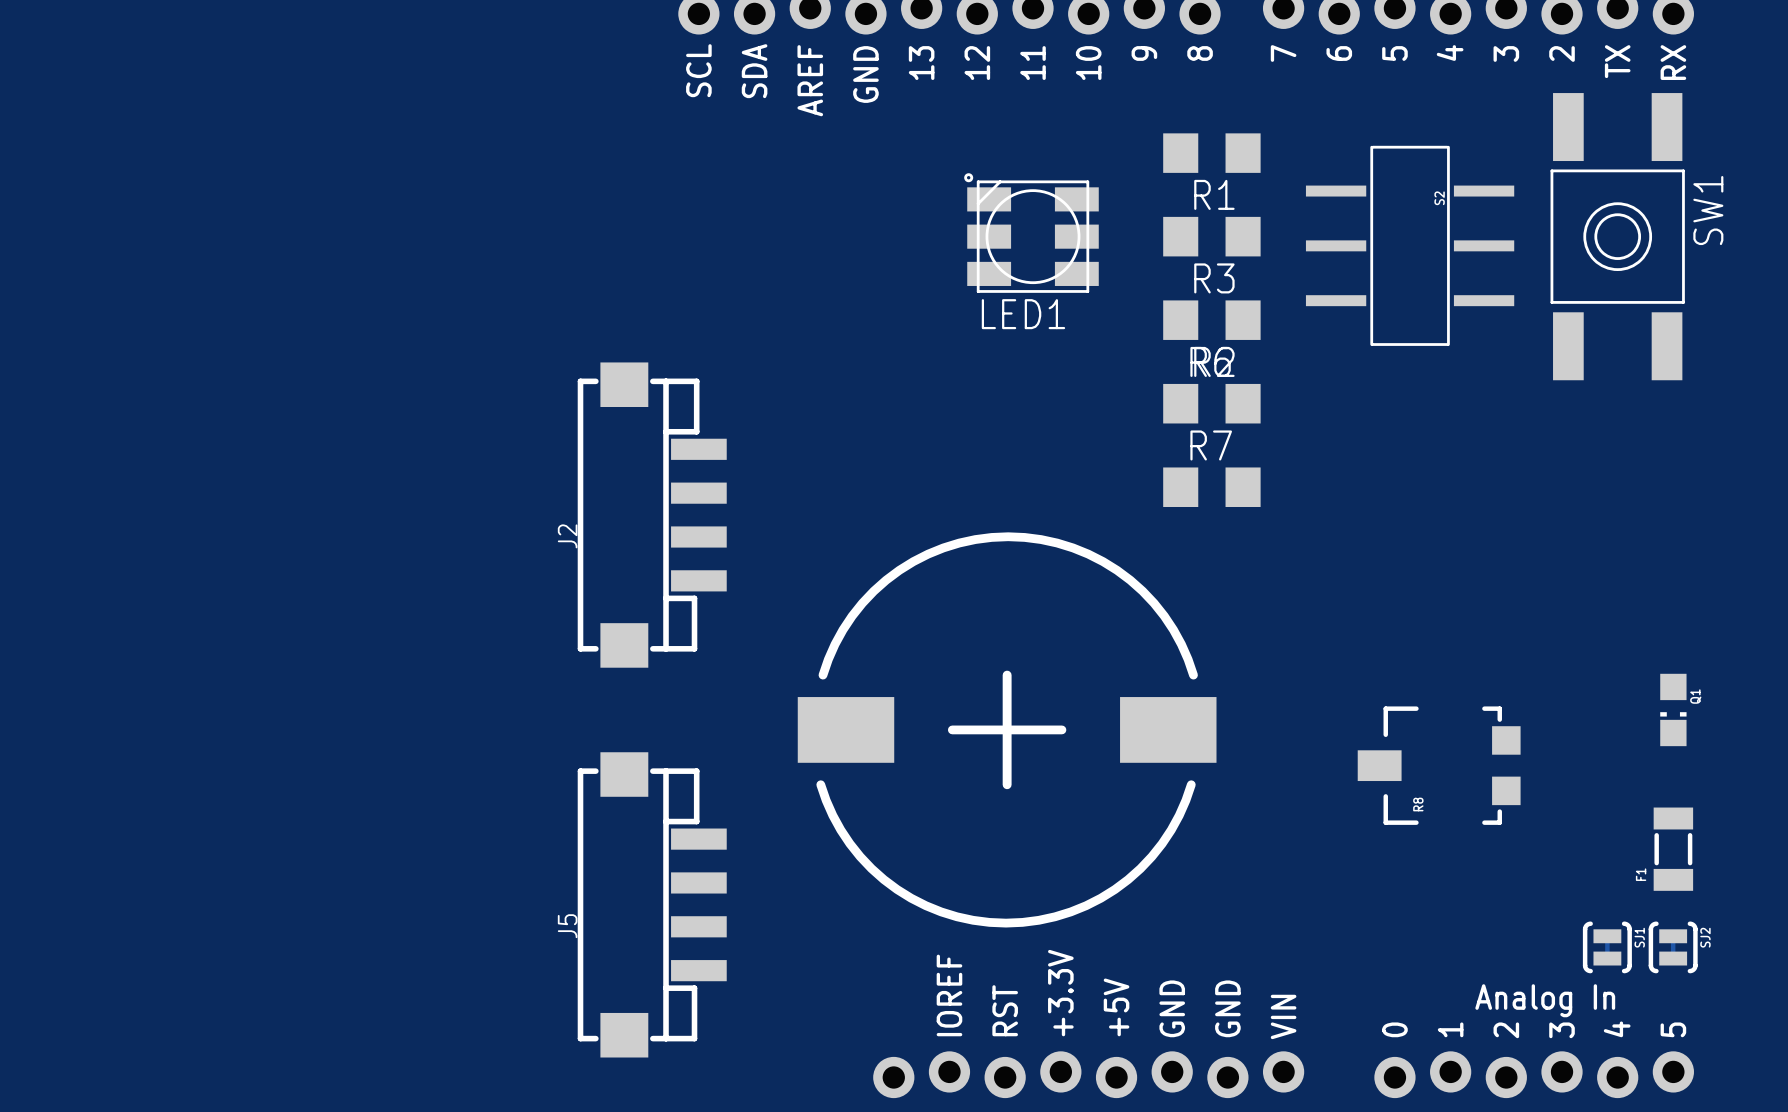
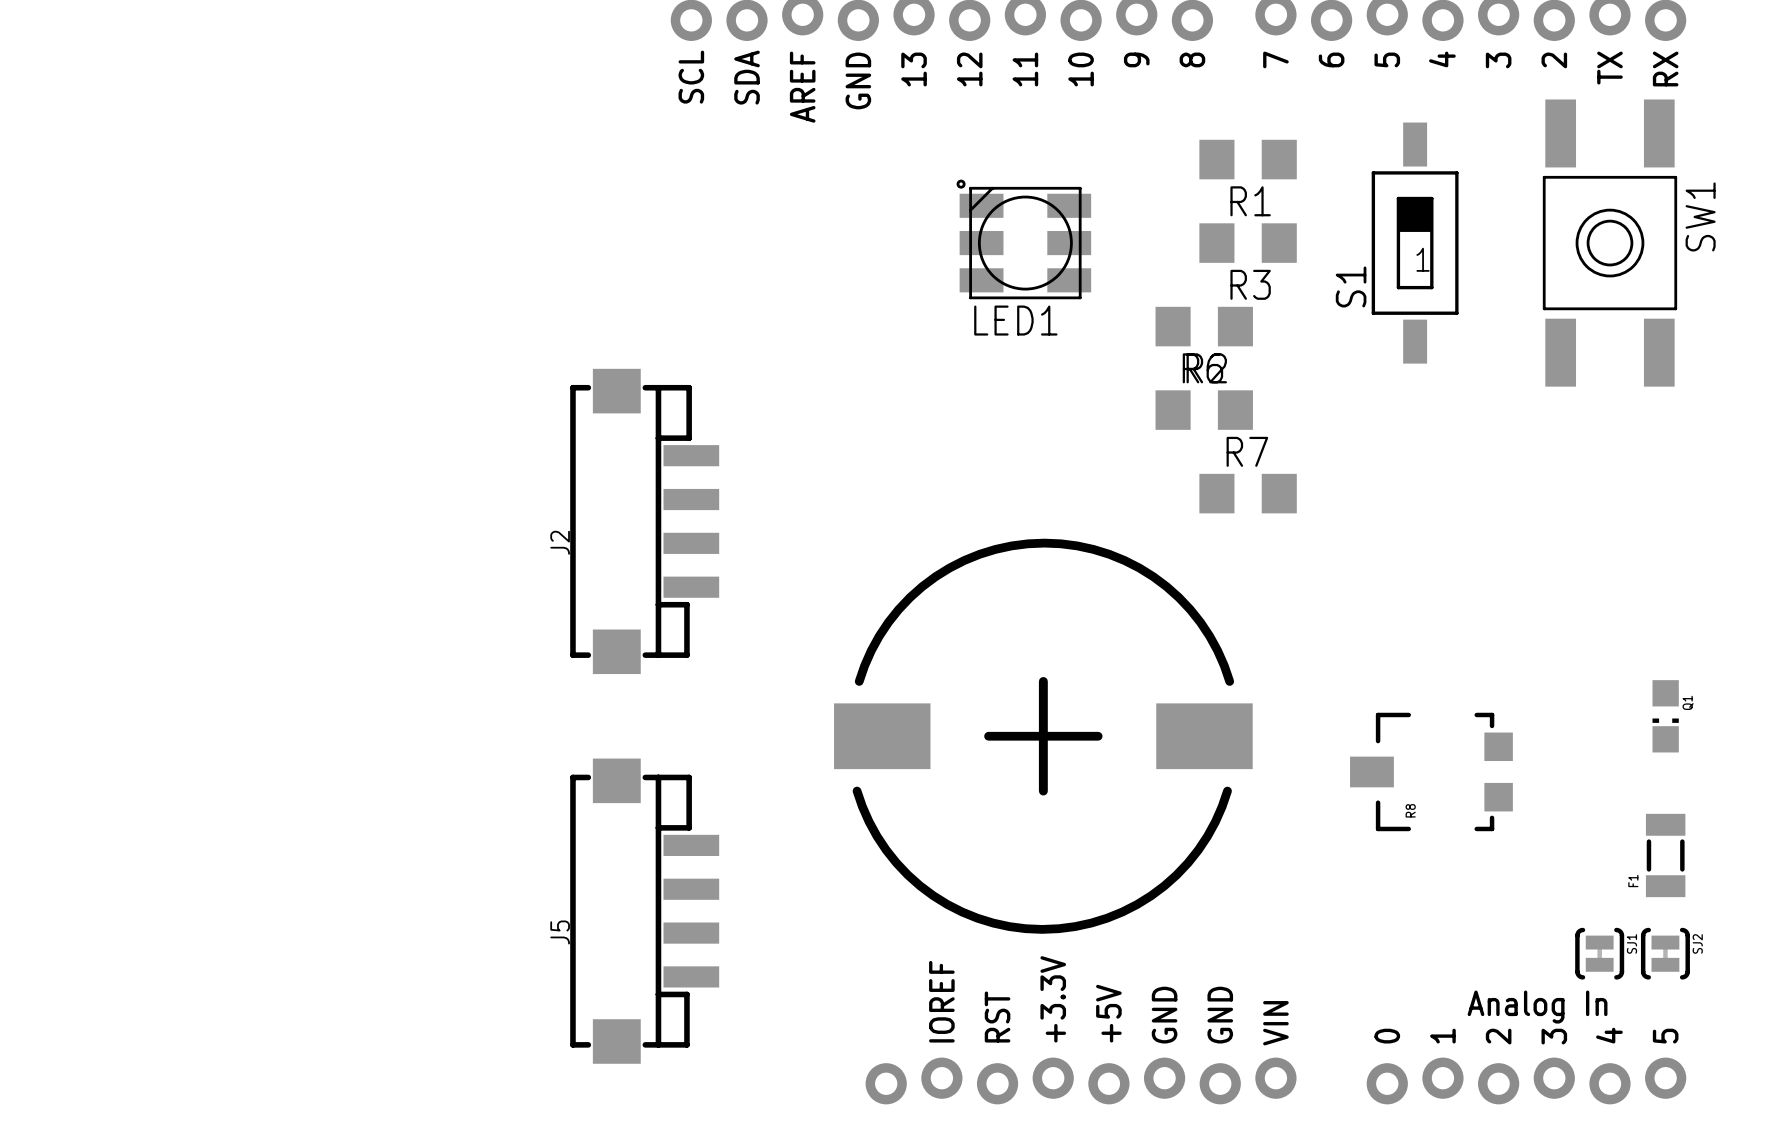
R1 position: (1211, 153) -> (1248, 159)
R3 position: (1211, 236) -> (1248, 243)
S1: none -> (1415, 243)
S2: (1410, 245) -> none
R7 position: (1211, 487) -> (1248, 493)
part position: (1007, 729) -> (1043, 736)

